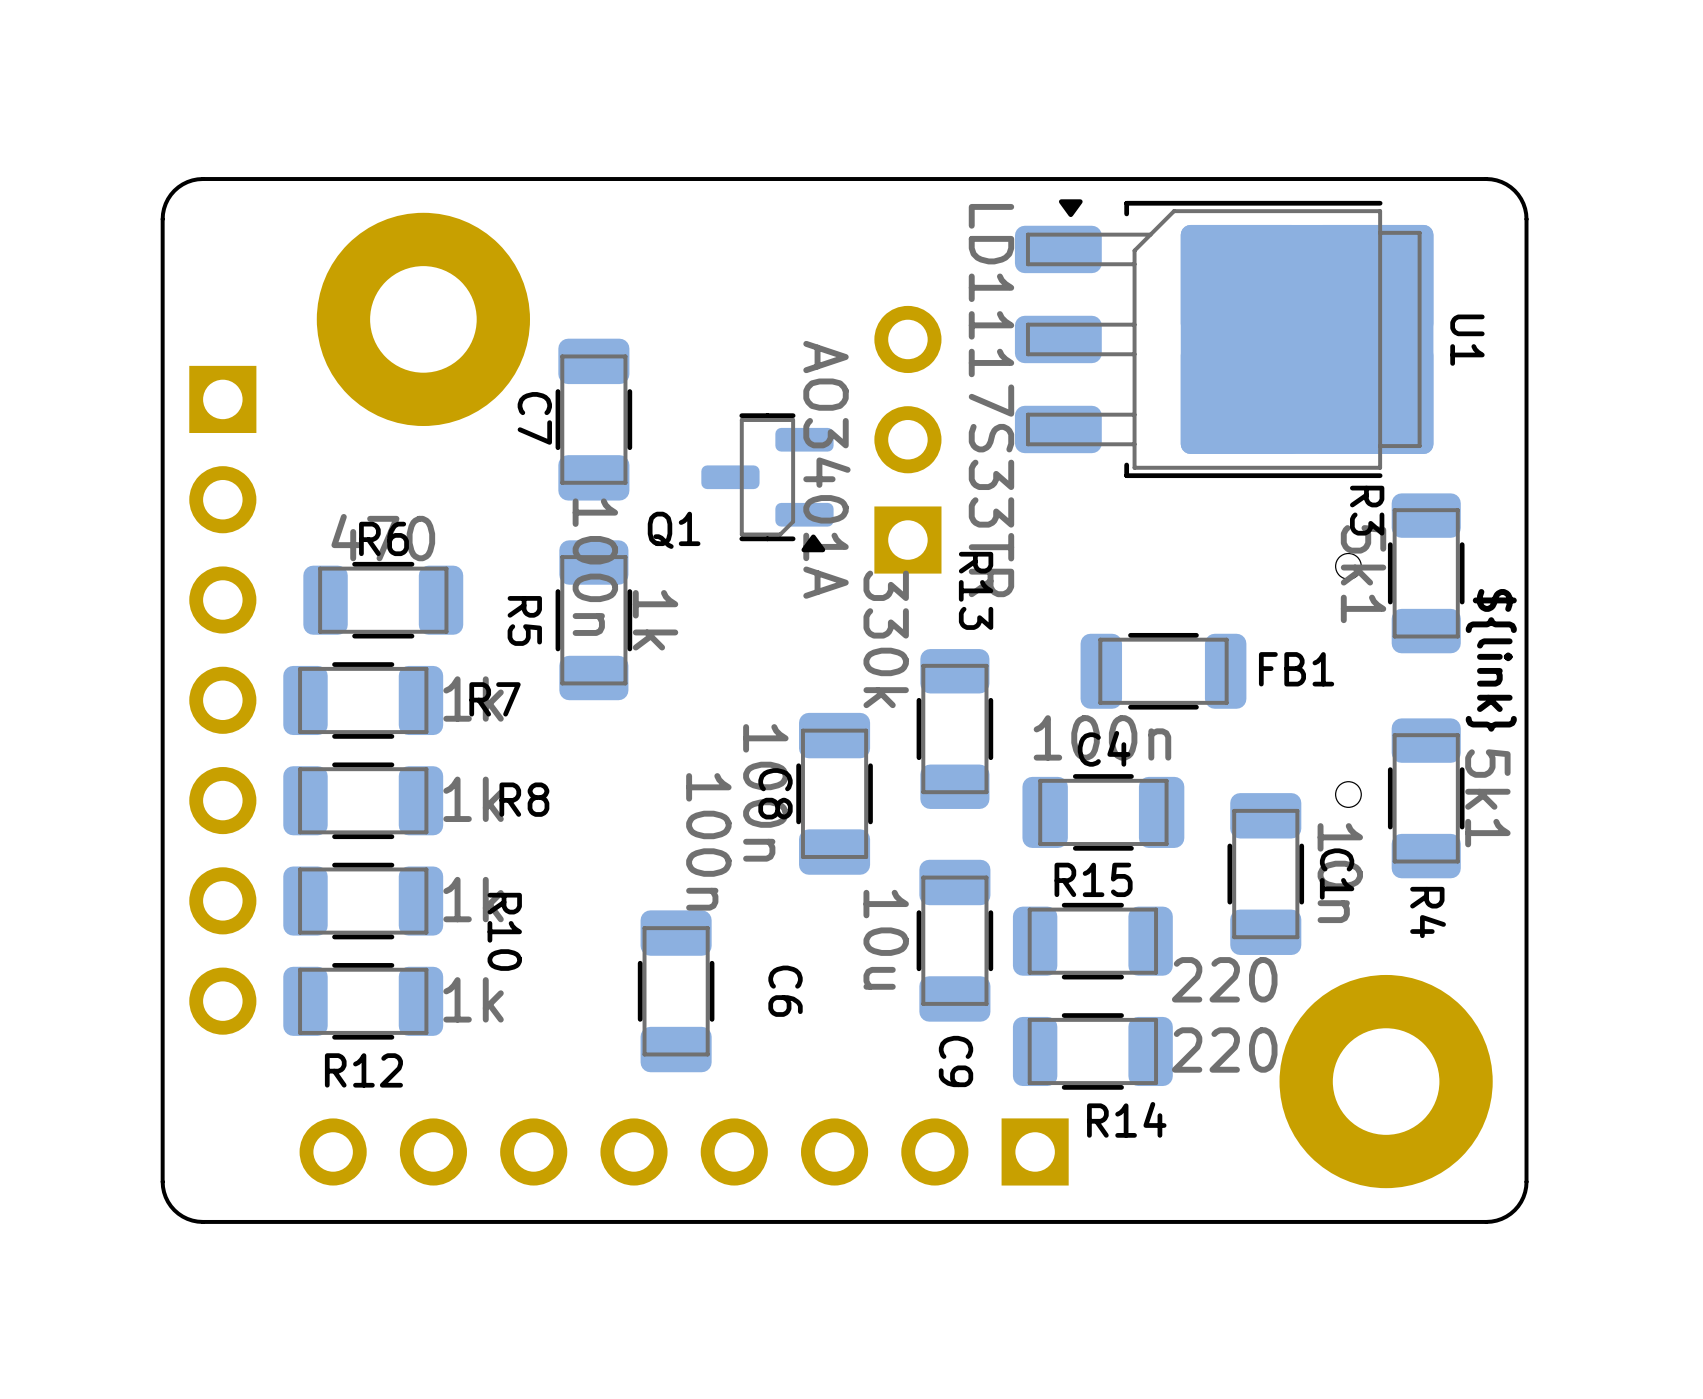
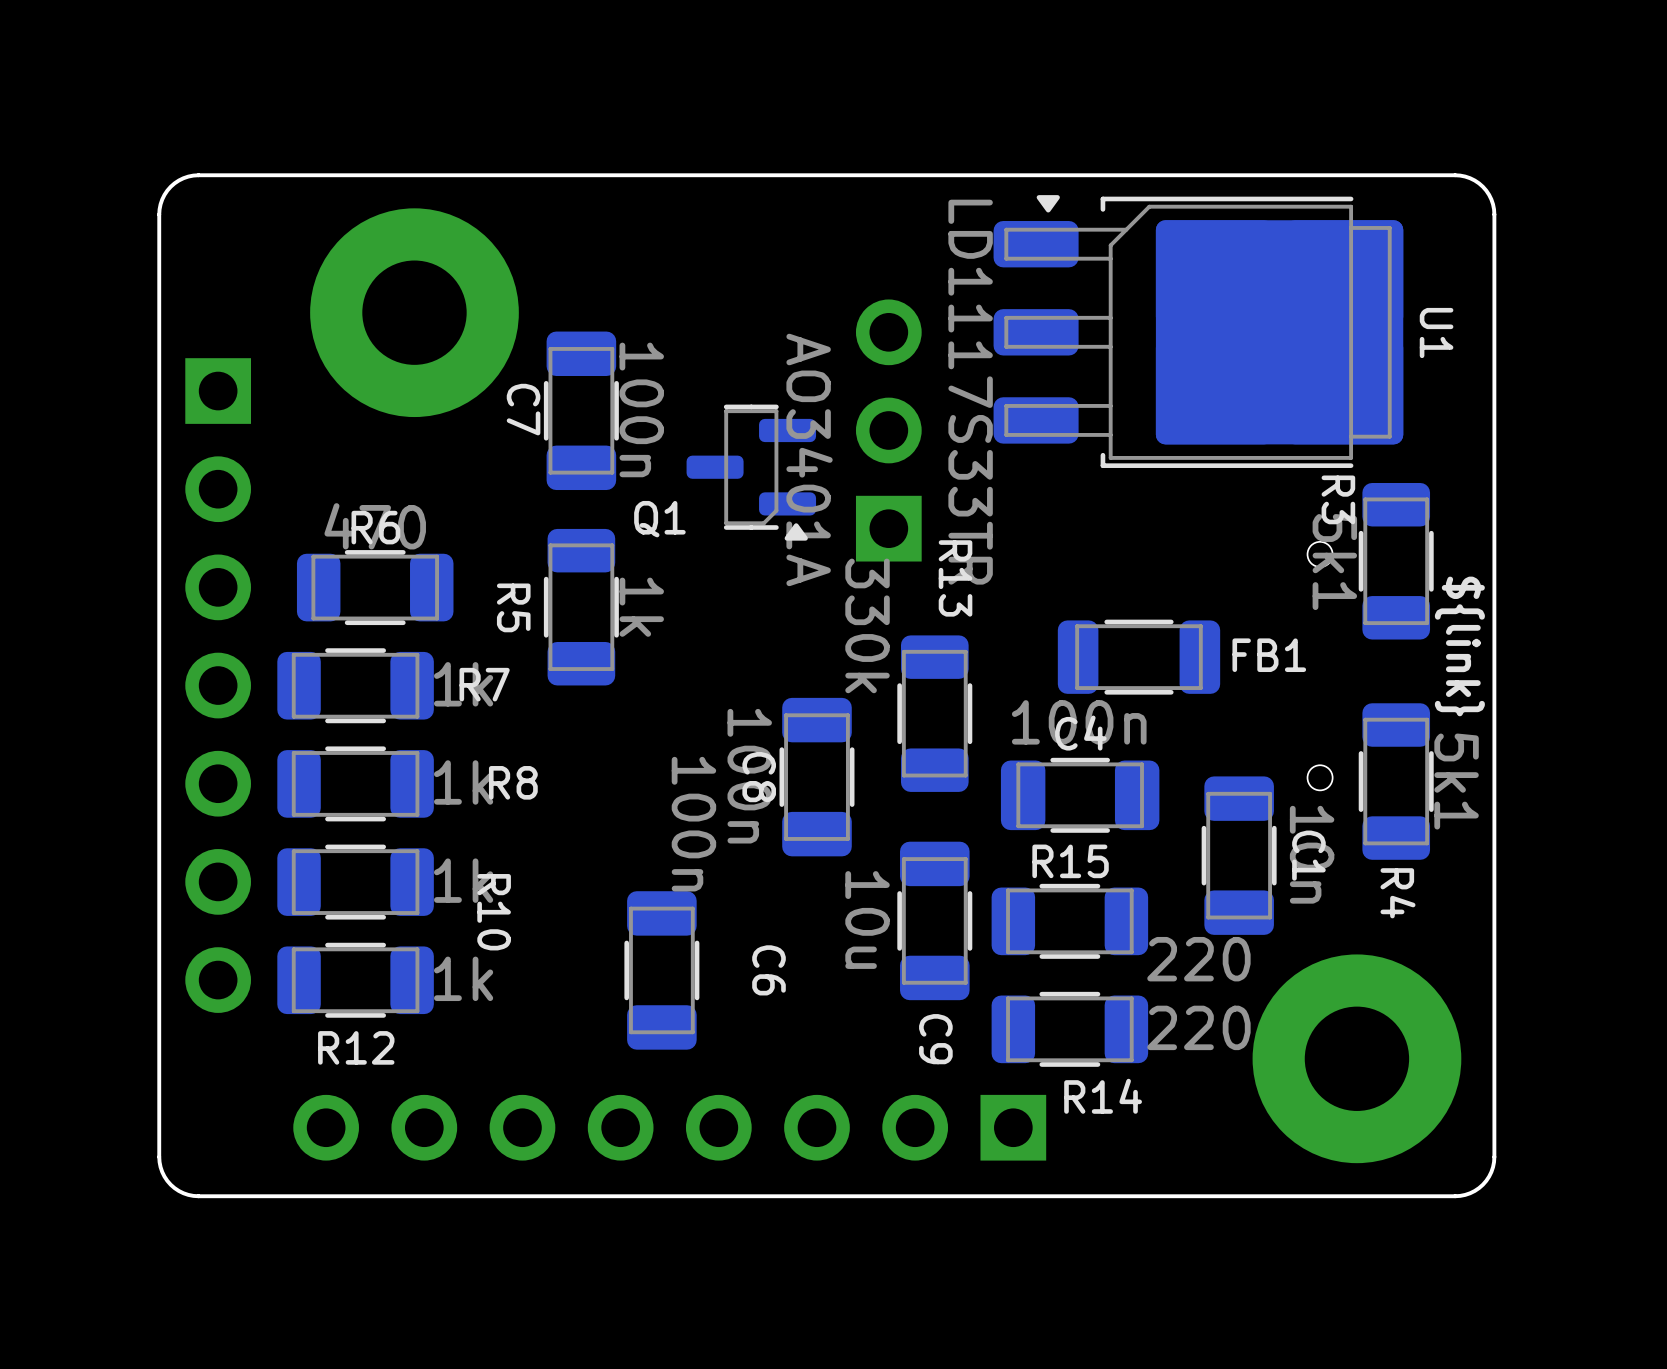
C7 value position: 100n (595, 567) -> 100n (641, 409)

